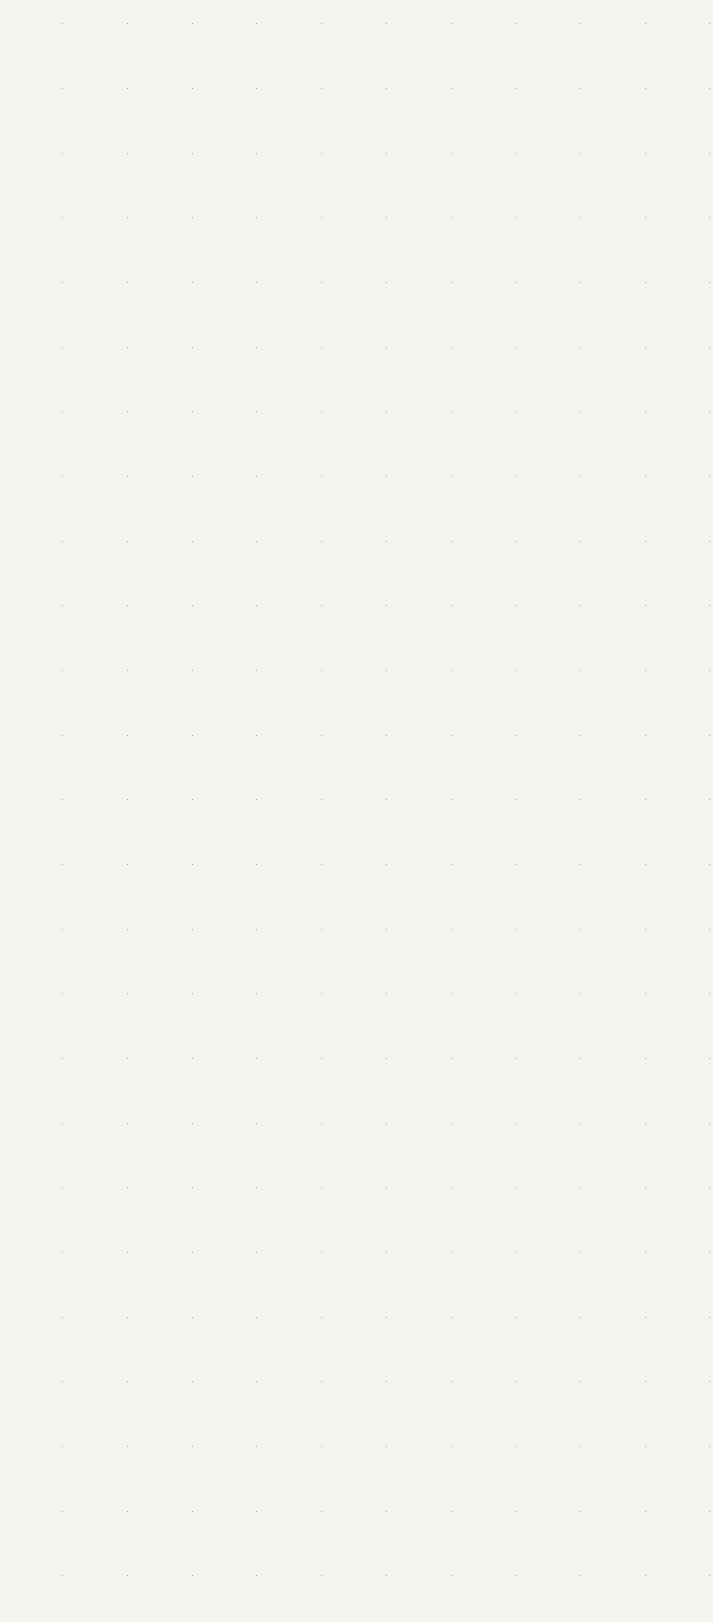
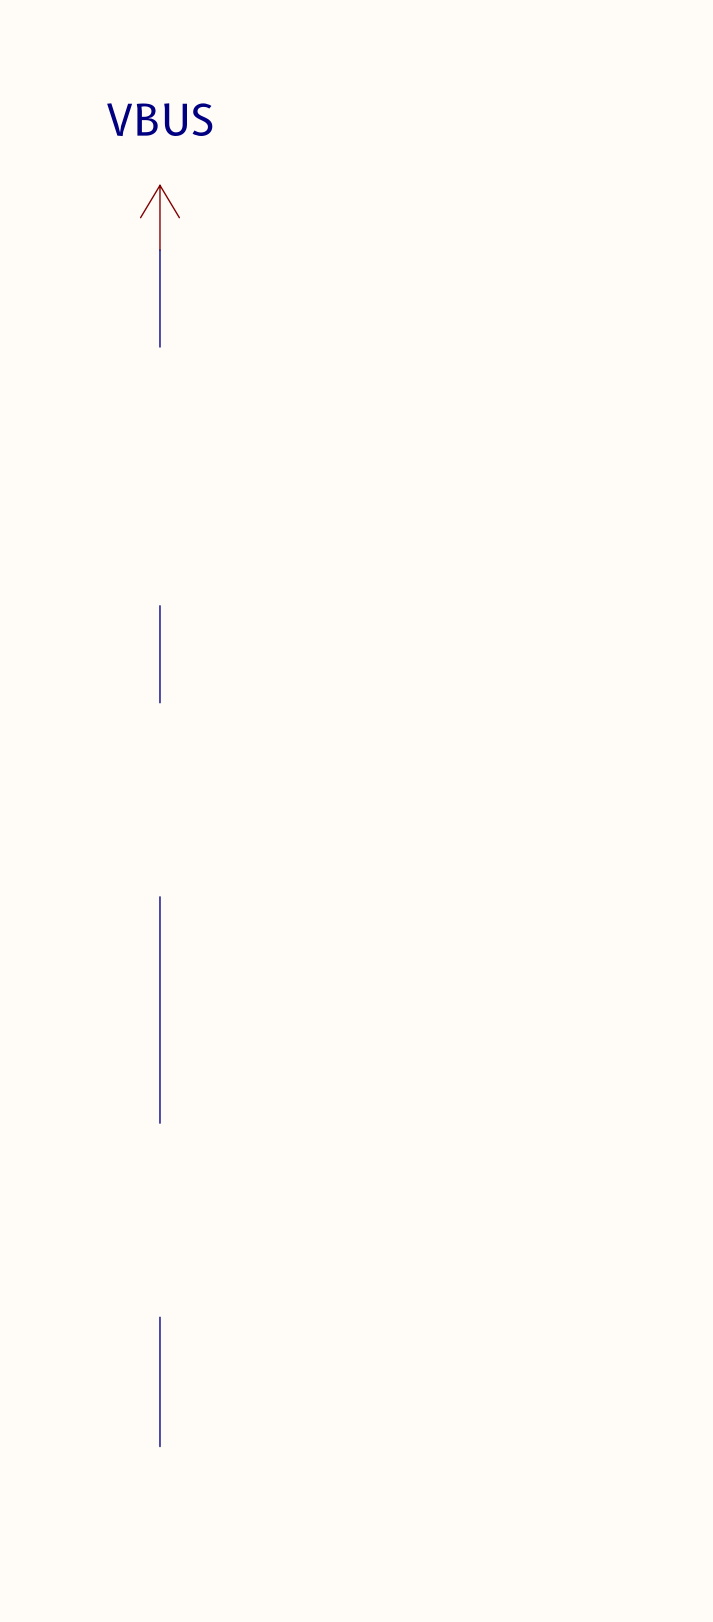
power symbol: none -> VBUS (159, 217)
wire: none -> (159, 250) (159, 347)
wire: none -> (159, 605) (159, 702)
wire: none -> (159, 896) (159, 1123)
wire: none -> (159, 1317) (159, 1446)

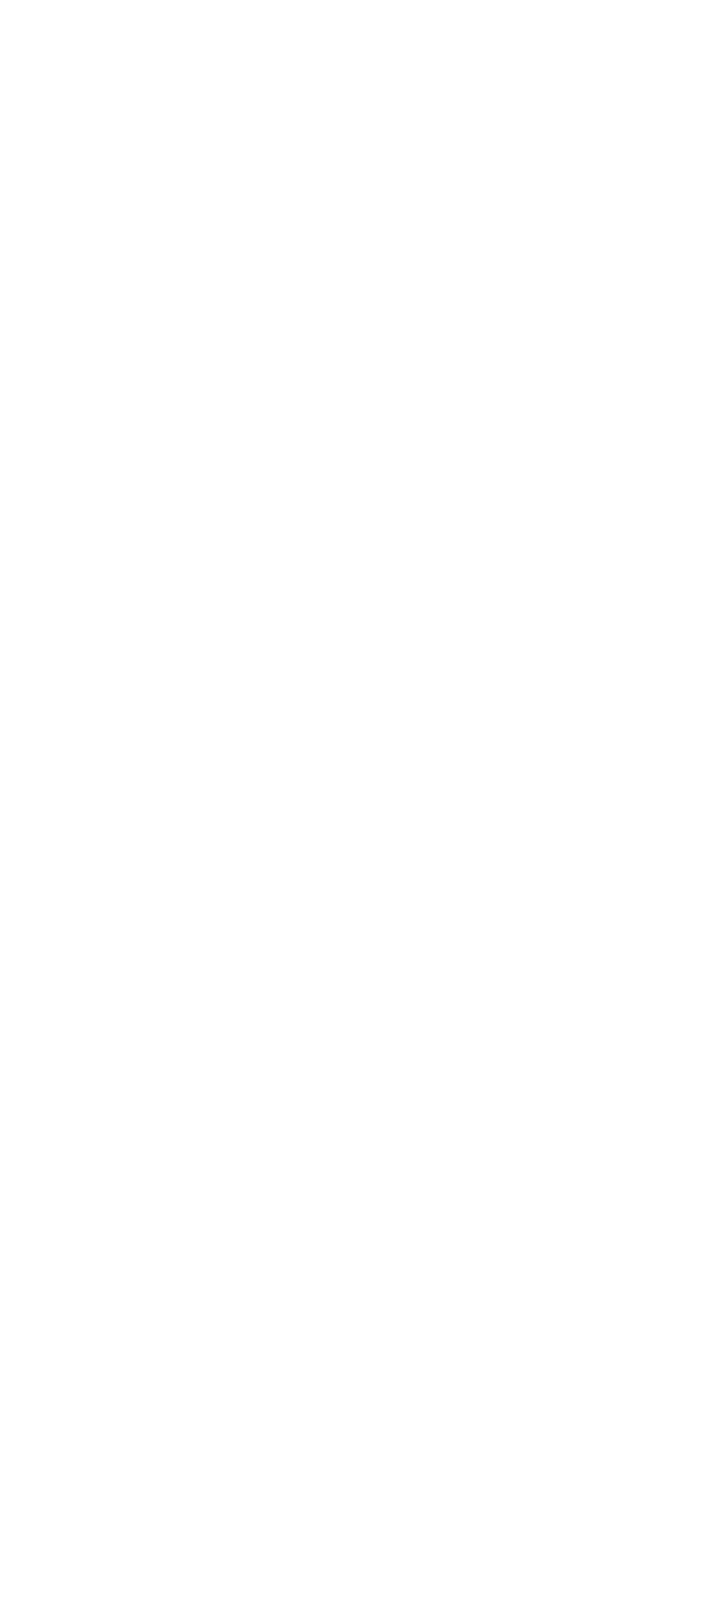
power symbol: VBUS (159, 217) -> none
wire: (159, 250) (159, 347) -> none
wire: (159, 605) (159, 702) -> none
wire: (159, 896) (159, 1123) -> none
wire: (159, 1317) (159, 1446) -> none

